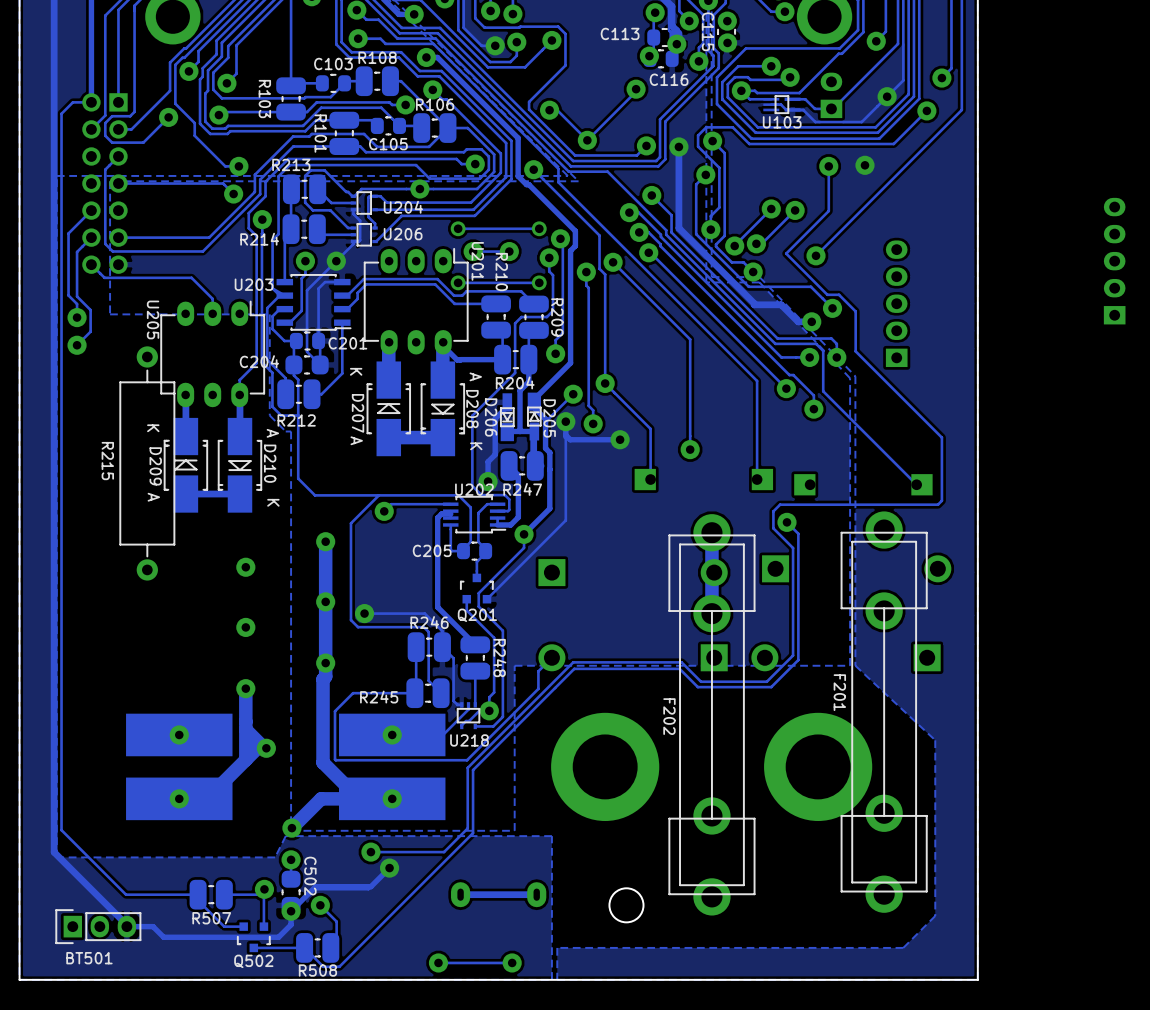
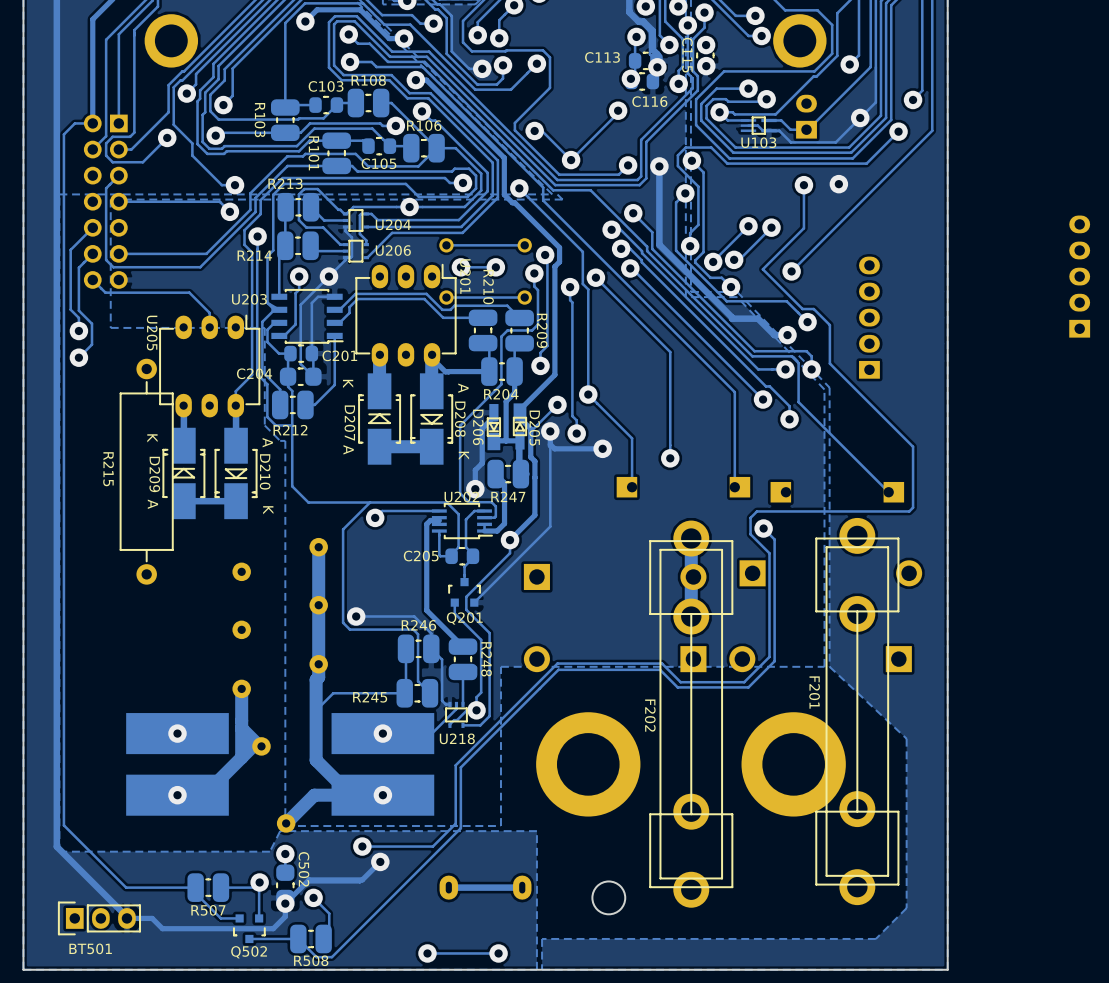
track: (551, 657) (538, 671) (538, 688) (467, 760) (335, 760) (335, 711) (353, 693) -> (318, 707) (333, 693) (345, 693)

